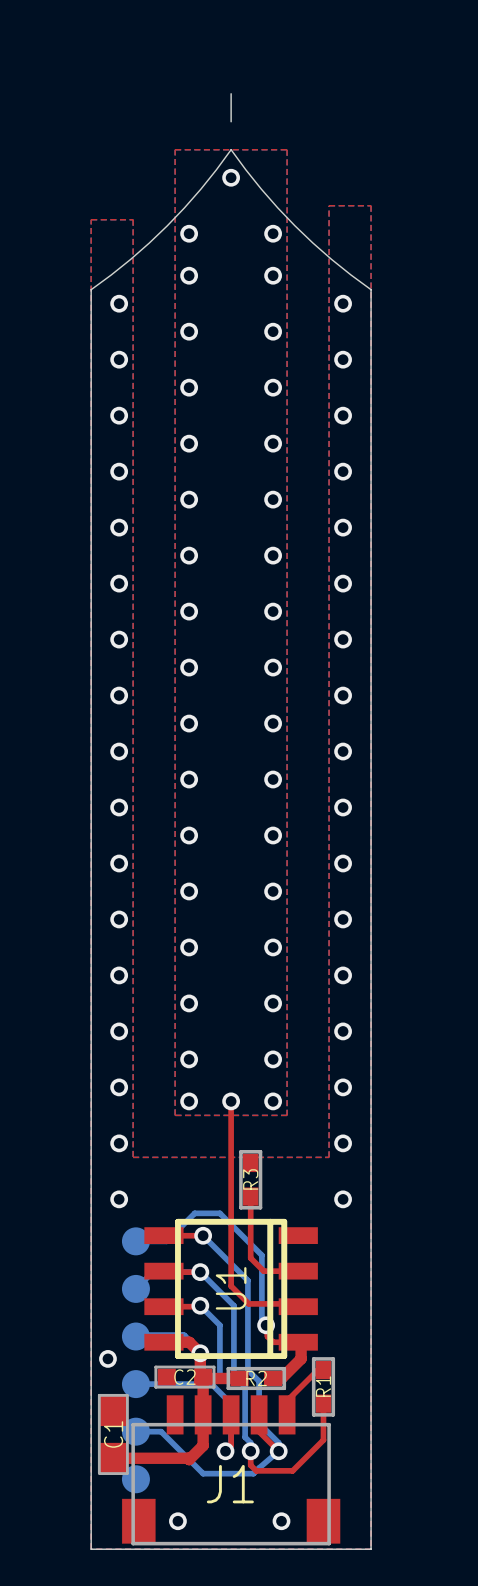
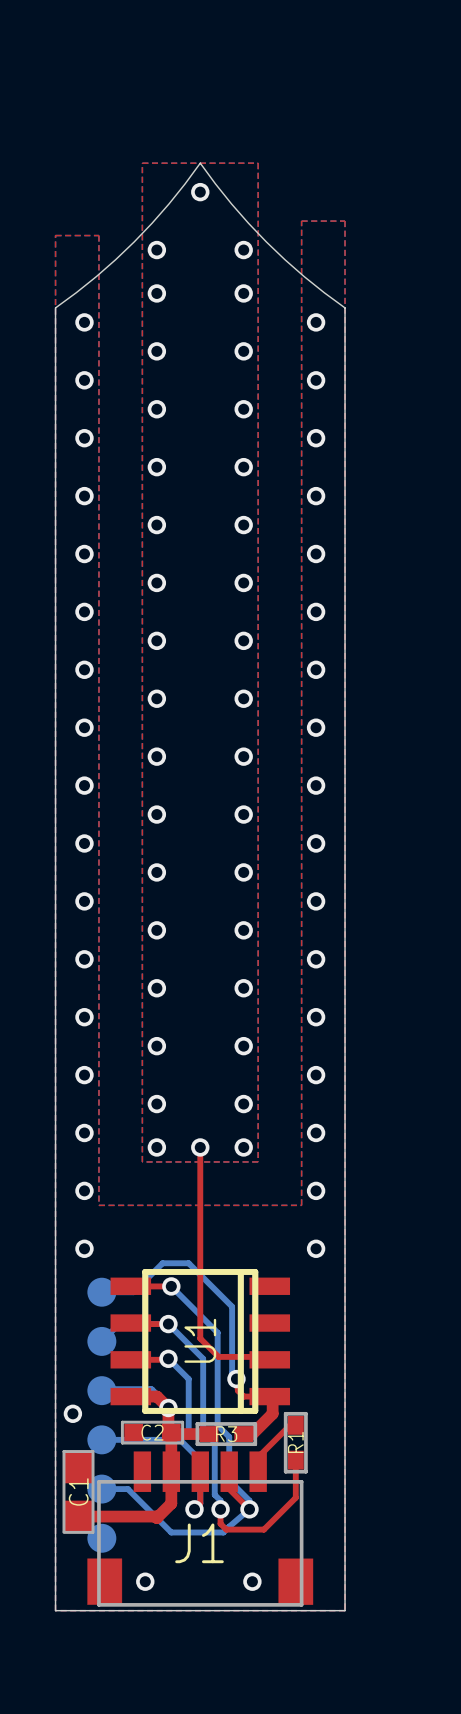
board edge: (231, 93) (231, 121) -> none
R3: (250, 1179) -> none
top track: (250, 1196) (250, 1258) (263, 1271) (298, 1271) -> none
R2 name: R2 (256, 1378) -> R3 (226, 1434)

